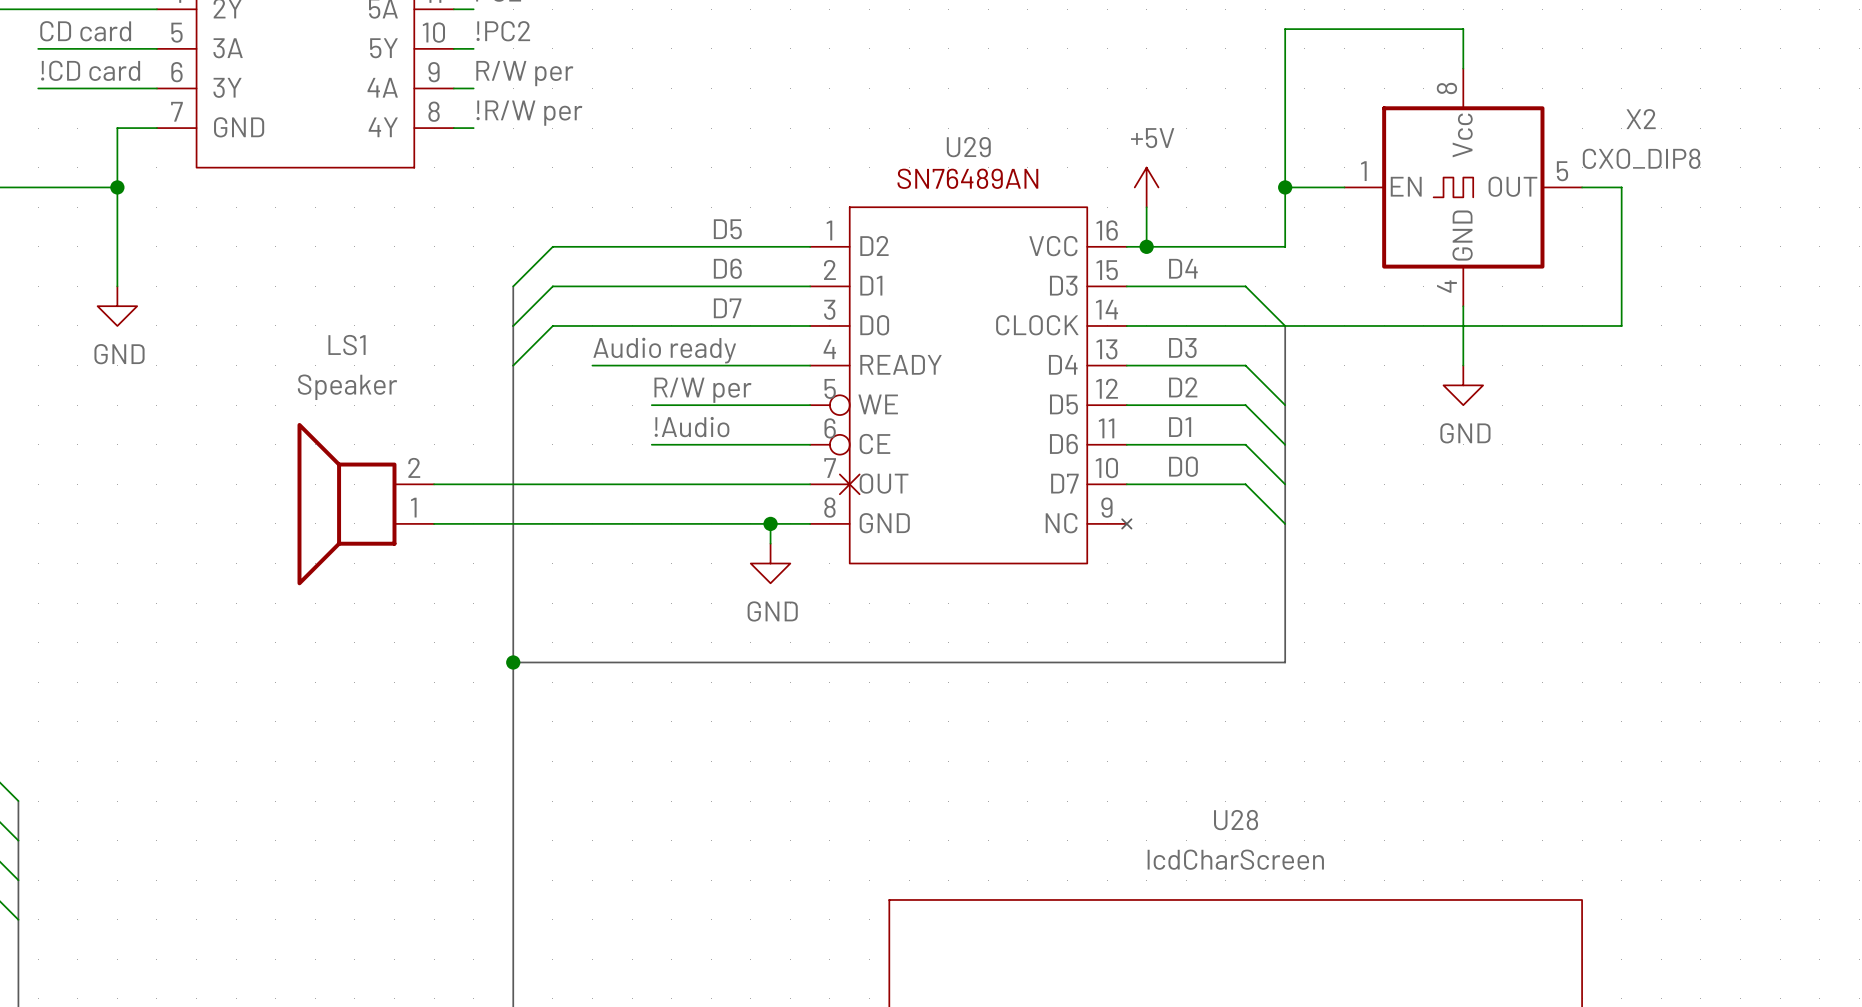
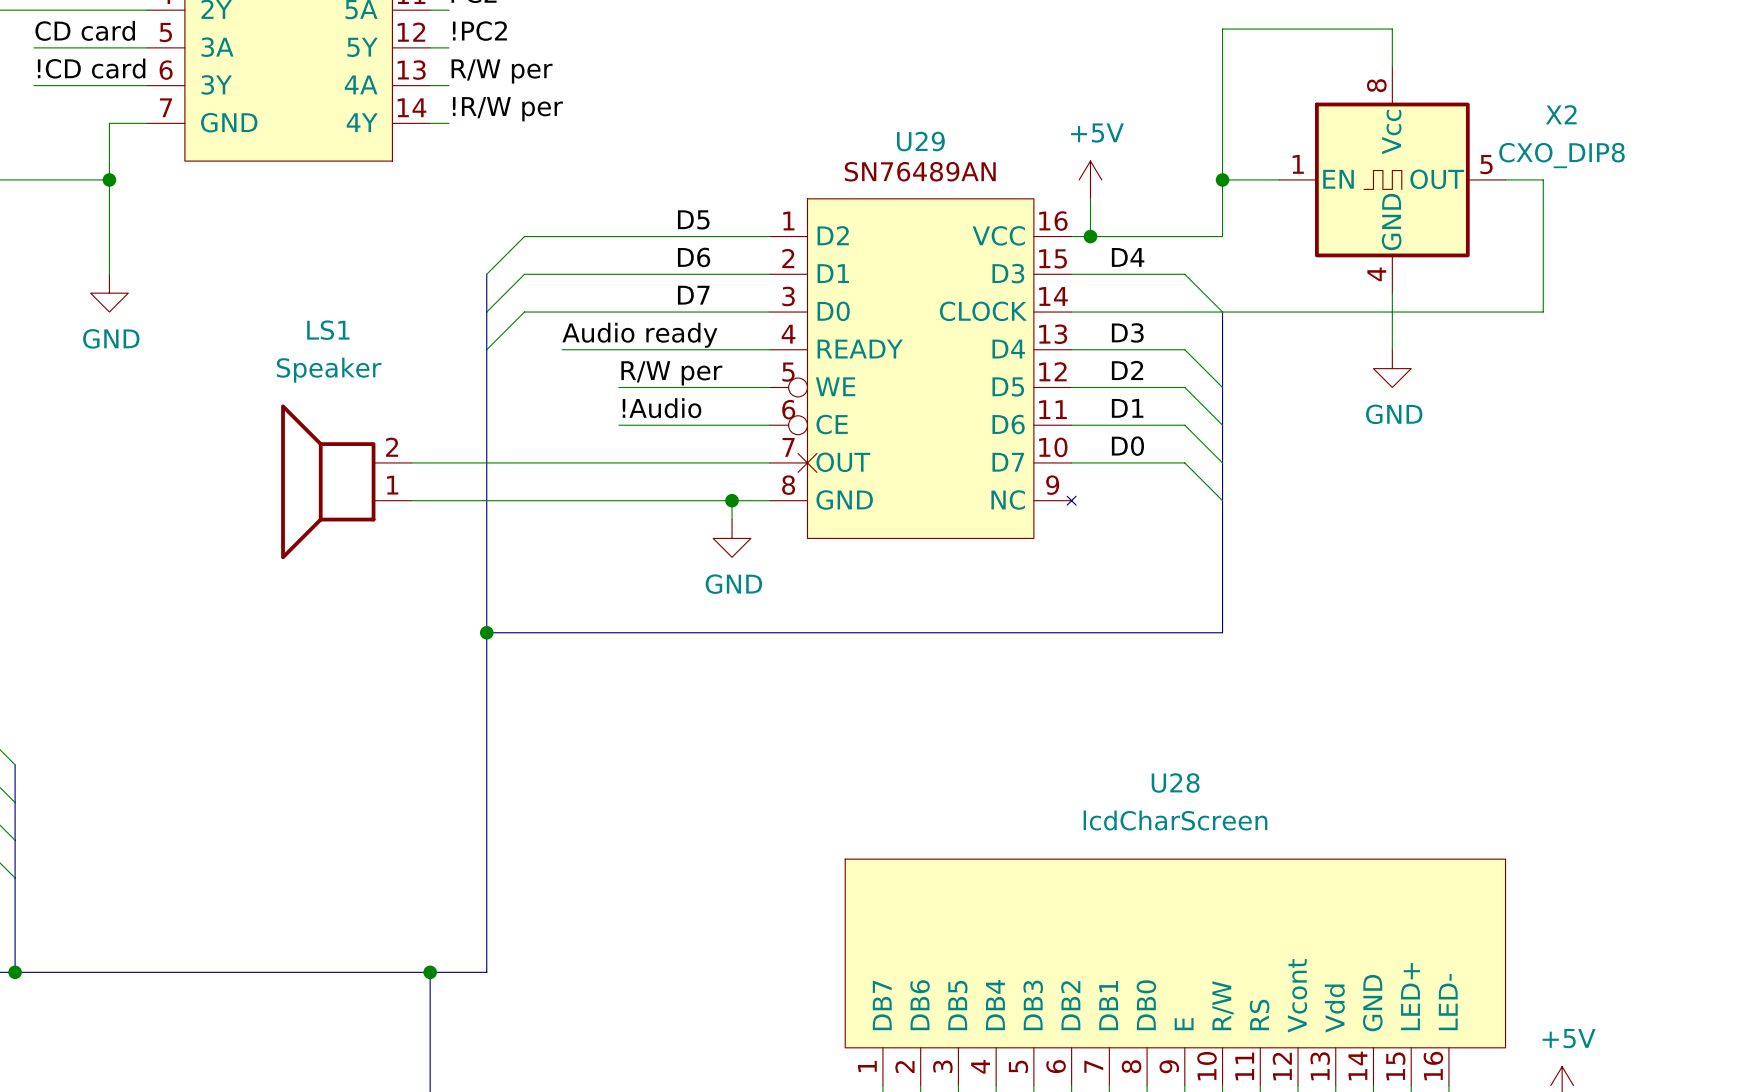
part pin number: 10 (433, 32) -> 12 (411, 32)
part pin number: 9 (433, 72) -> 13 (411, 70)
part pin number: 8 (434, 111) -> 14 (411, 107)

